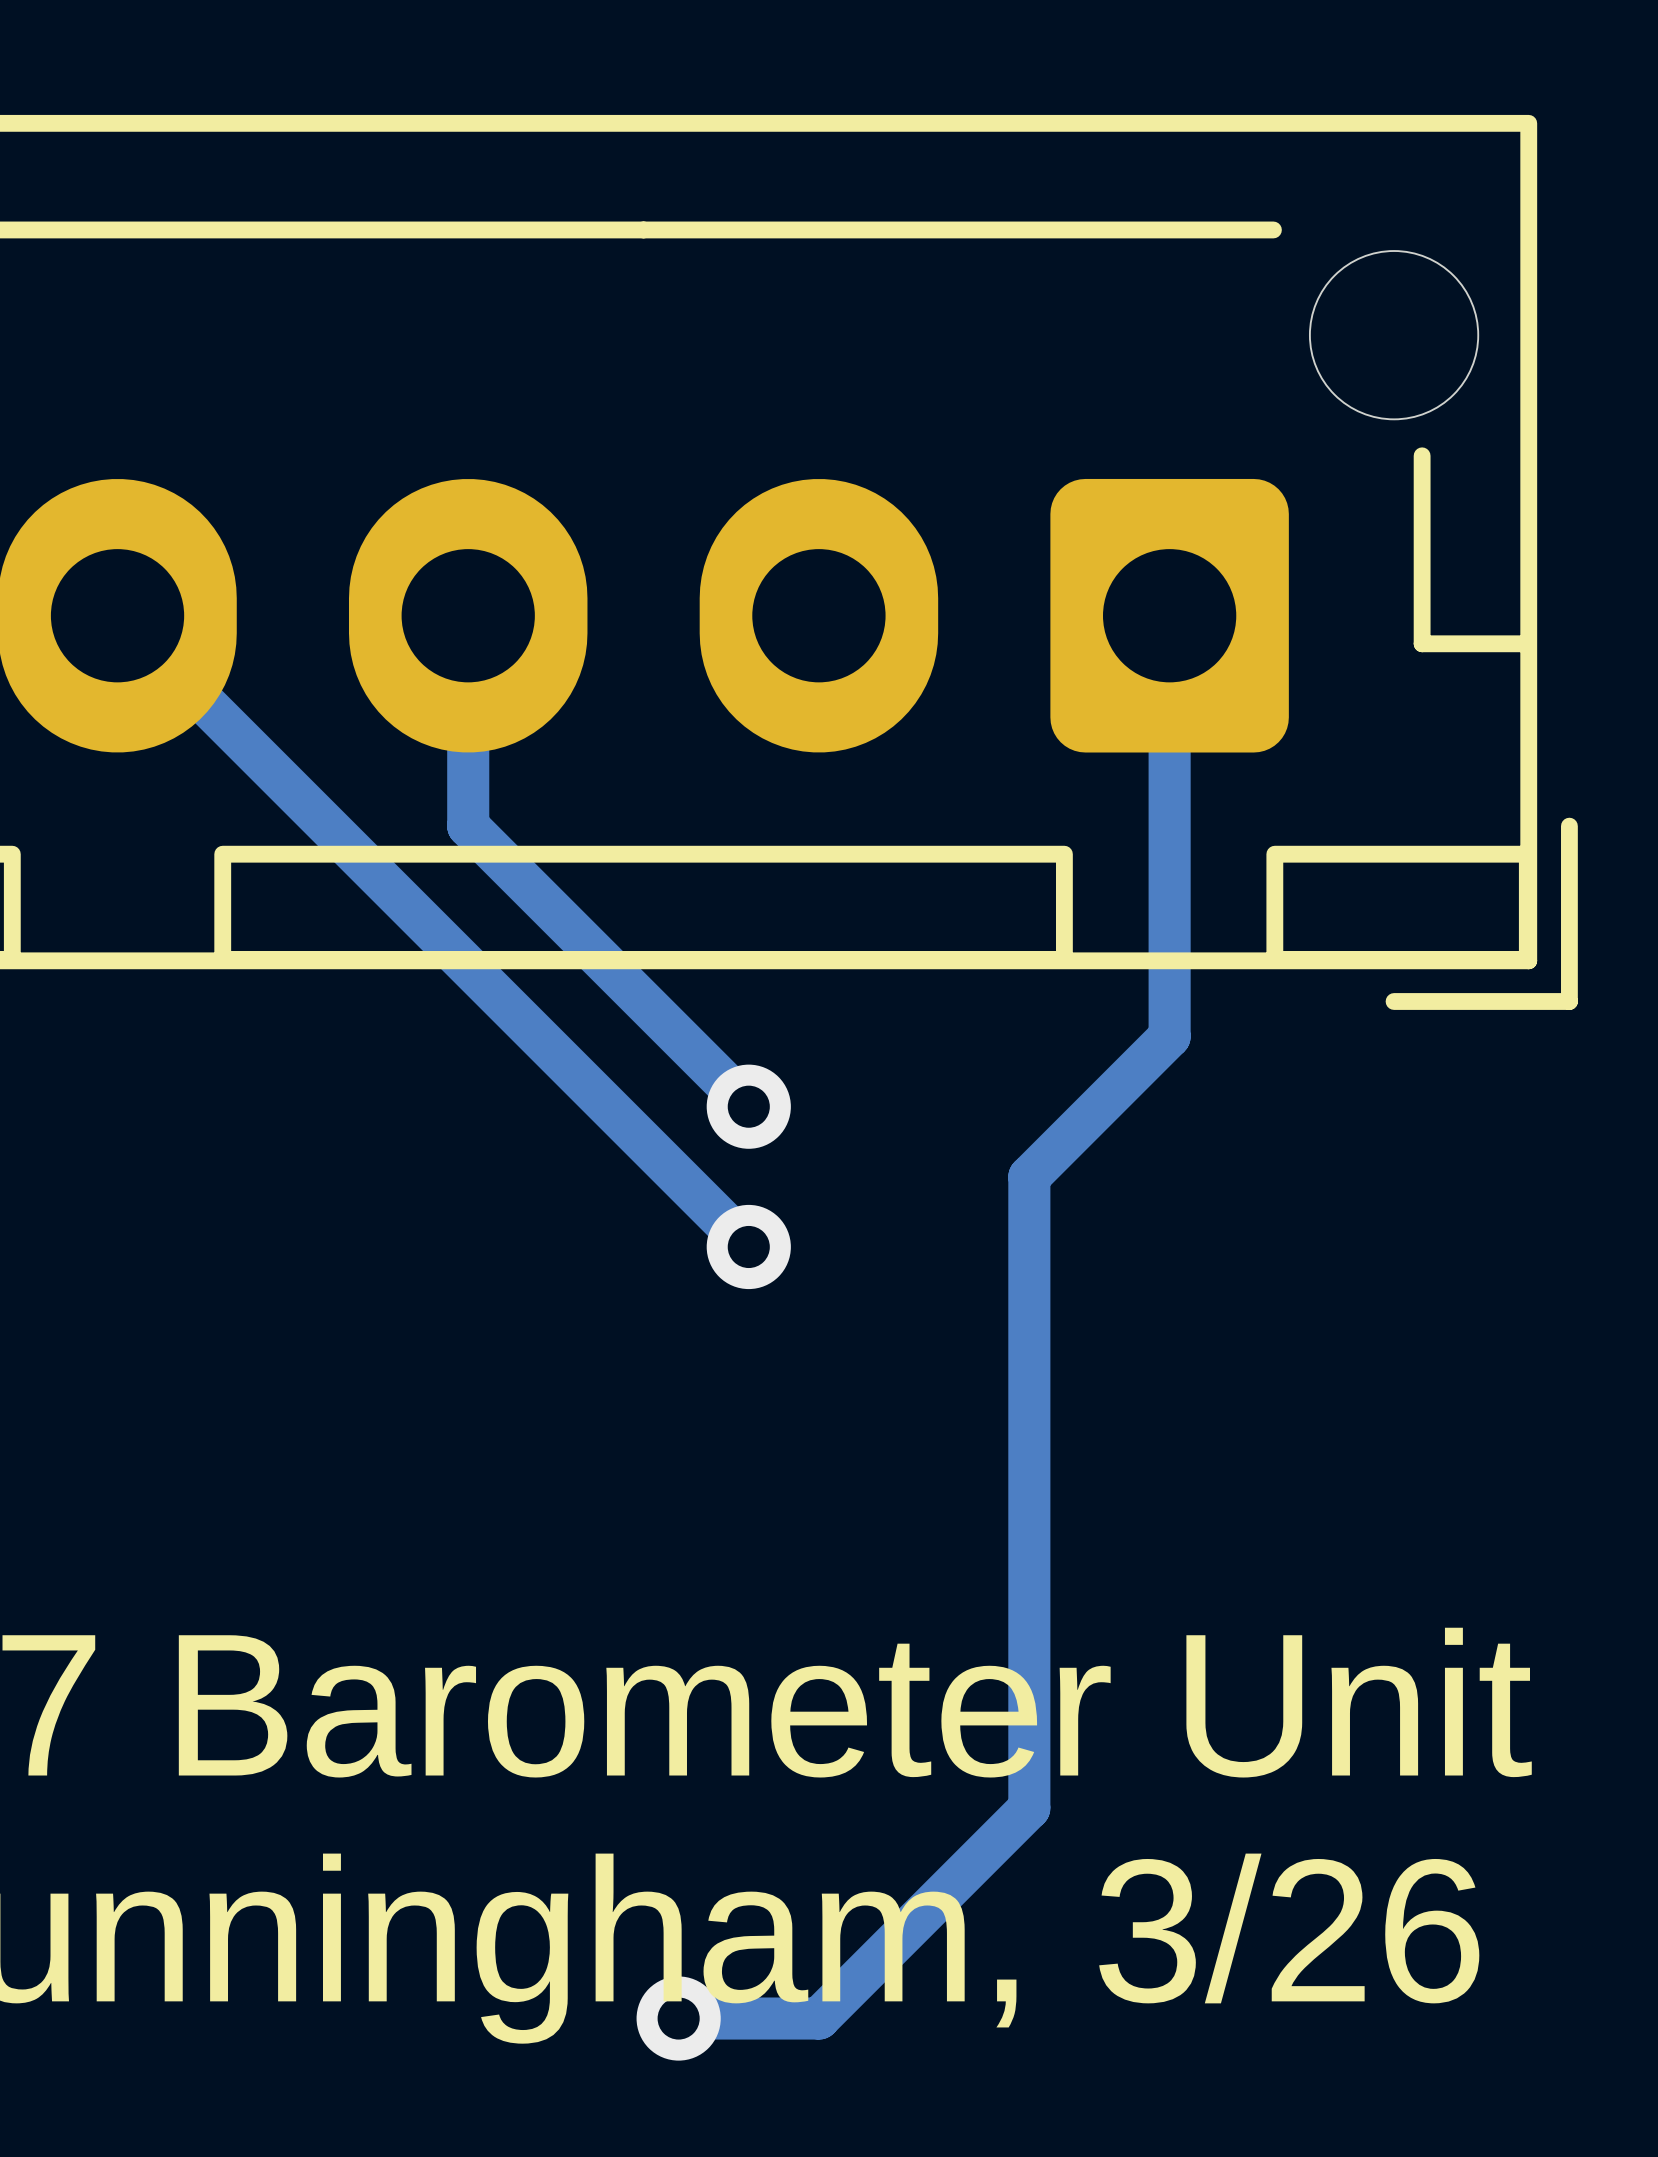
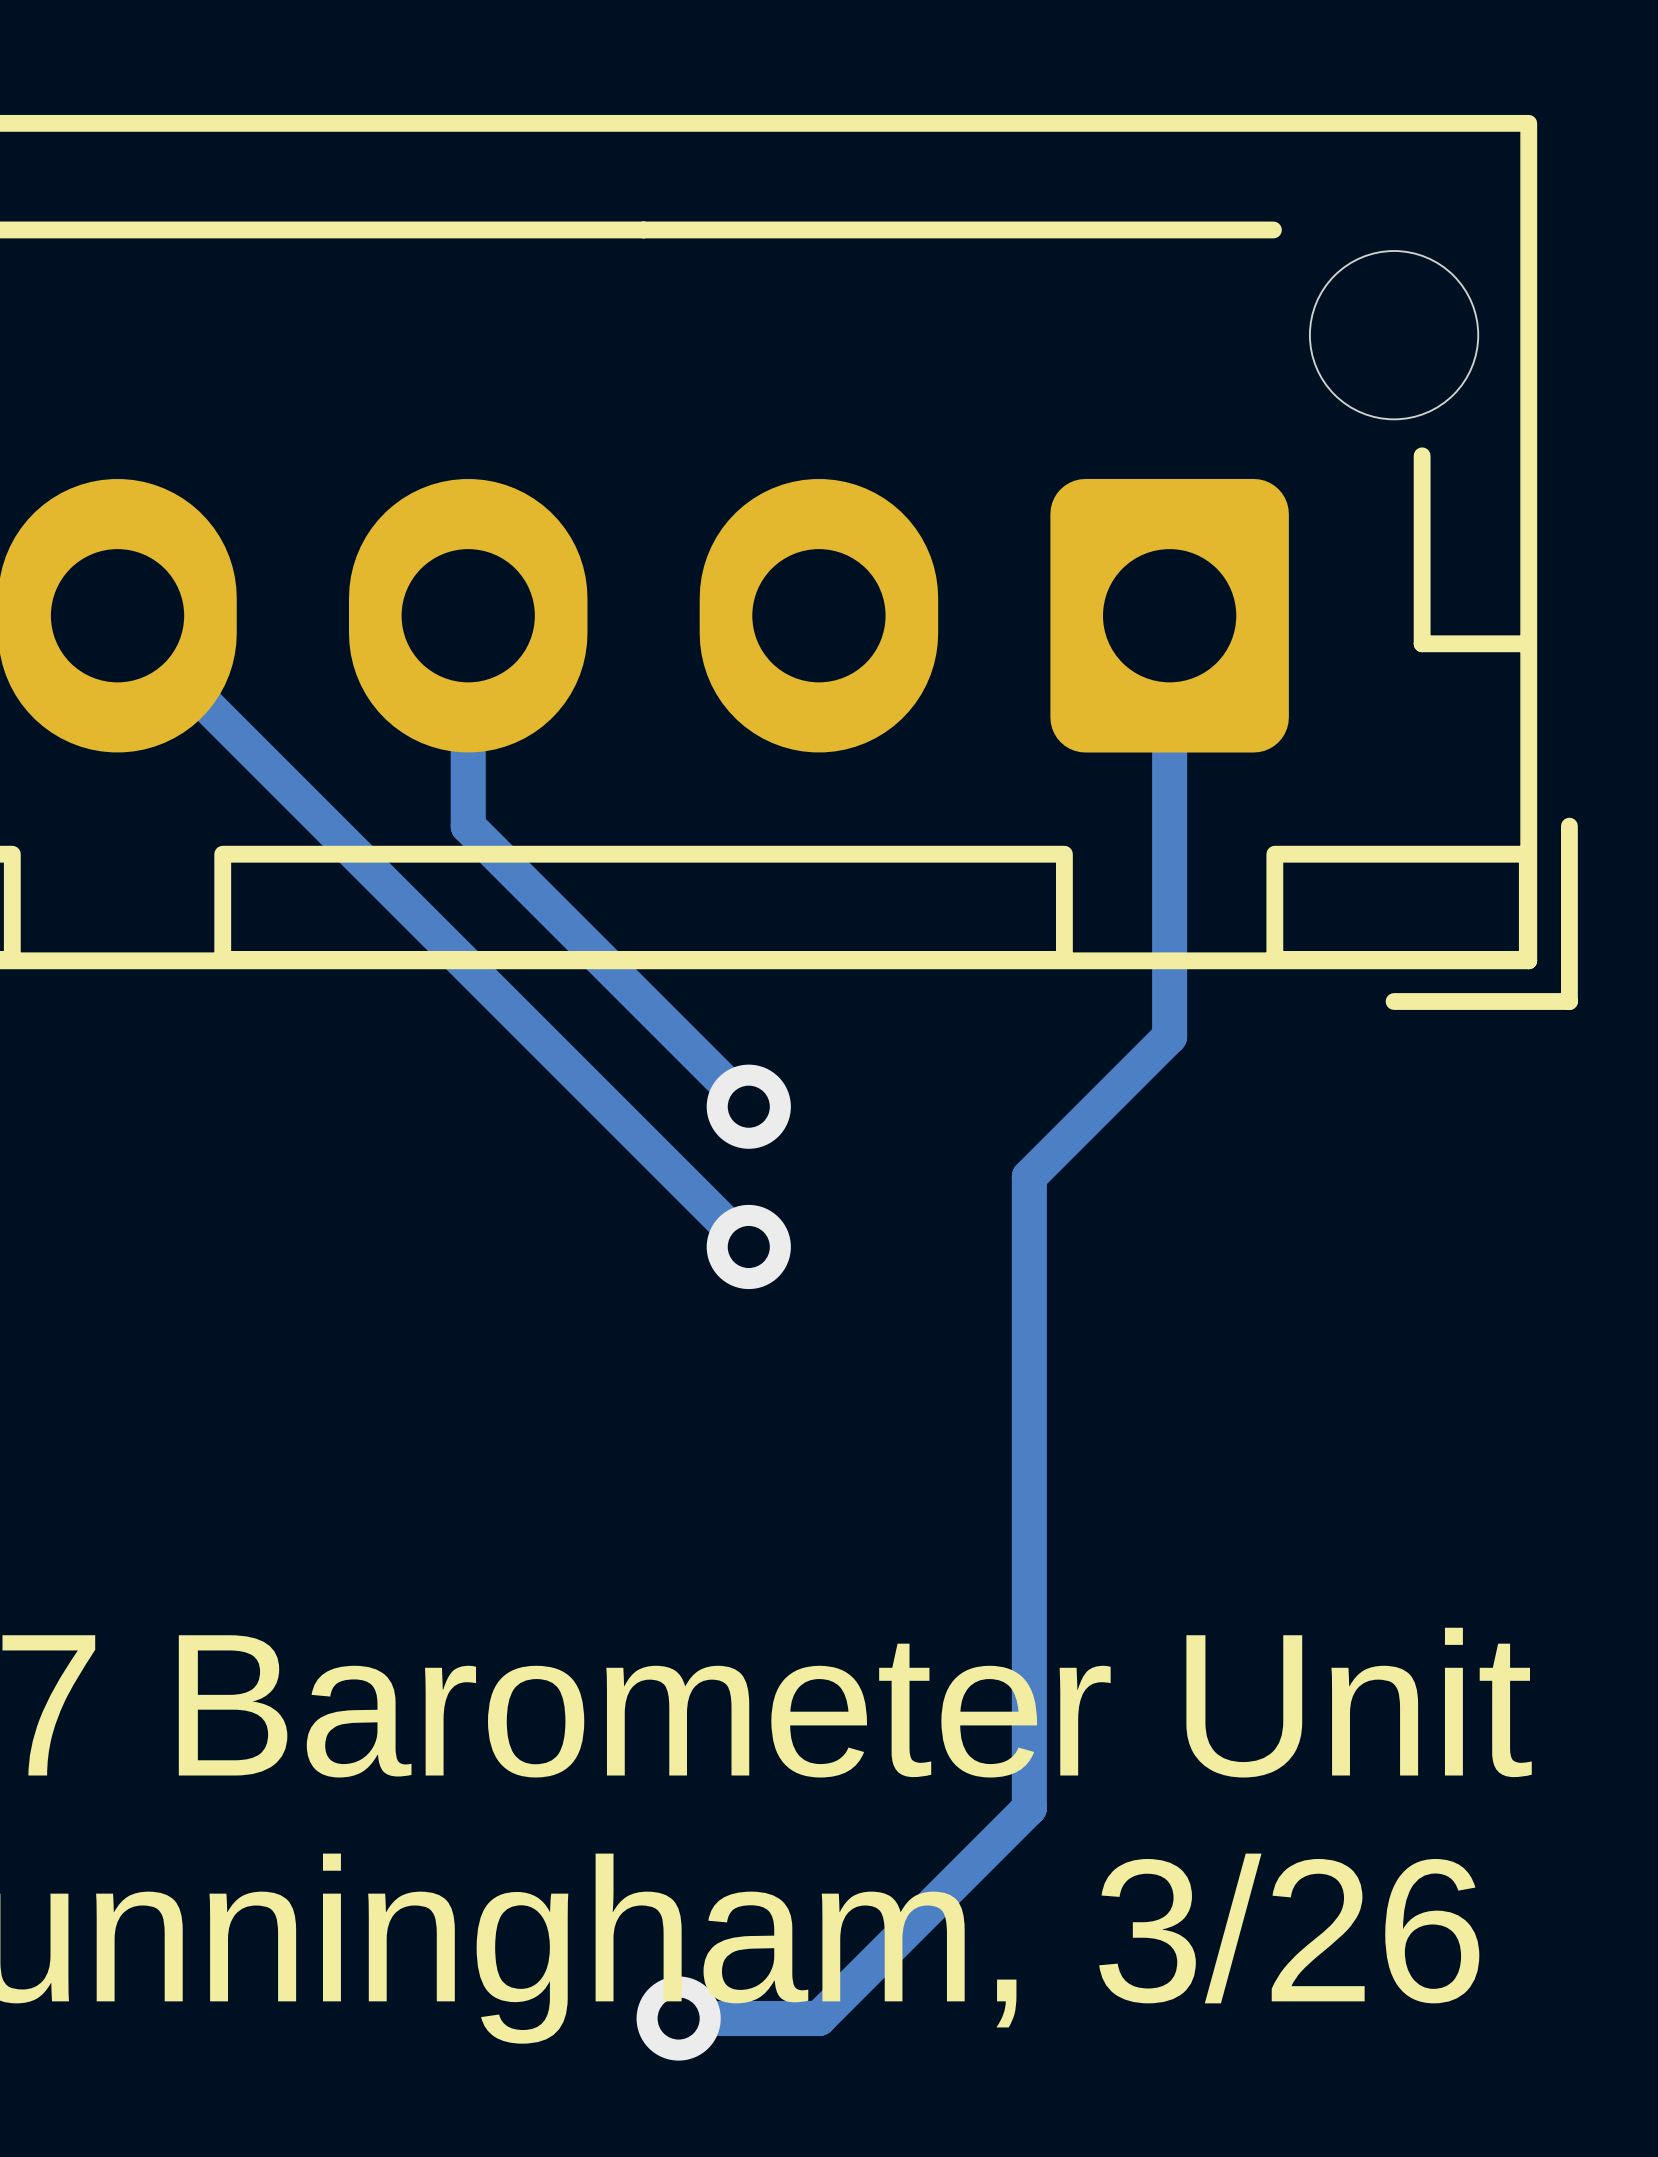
track width: thick (117, 615) (748, 1246) -> thin (117, 615) (748, 1246)
track width: thick (468, 615) (468, 826) (748, 1106) -> thin (468, 615) (468, 826) (748, 1106)
track width: thick (1169, 615) (1169, 1036) (1029, 1176) (1029, 1808) (818, 2018) (678, 2018) -> thin (1169, 615) (1169, 1036) (1029, 1176) (1029, 1808) (818, 2018) (678, 2018)

